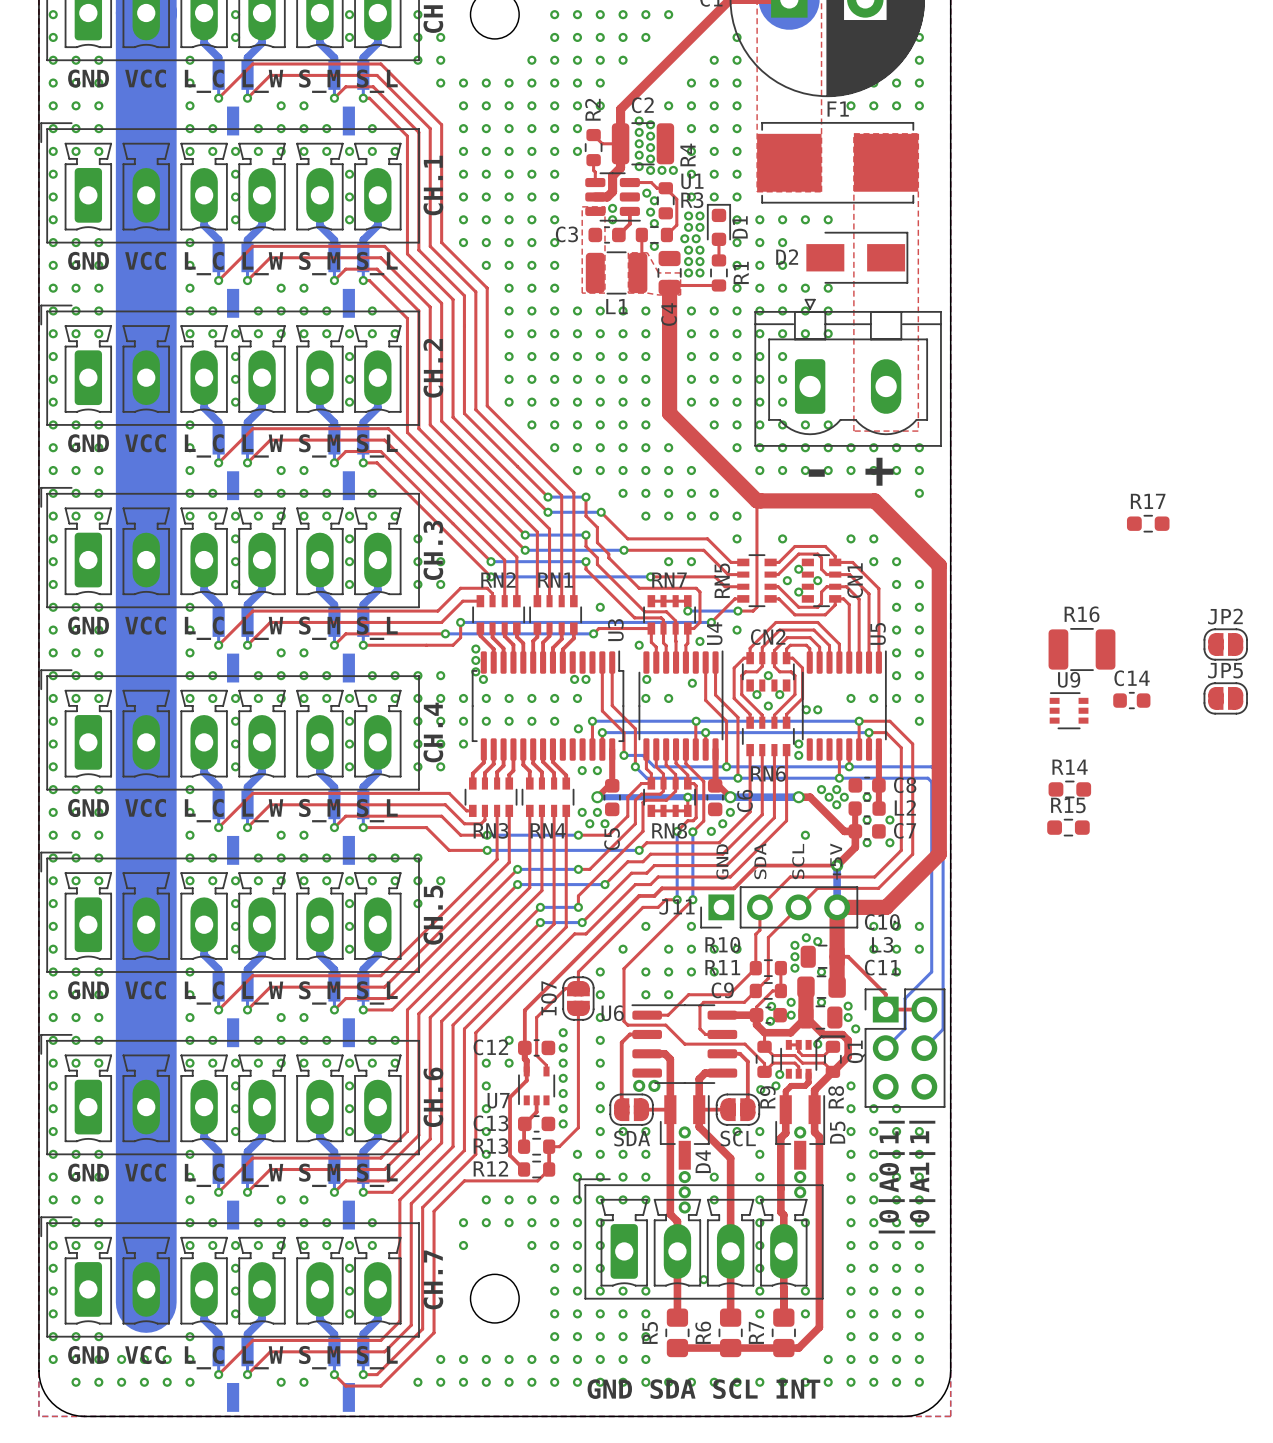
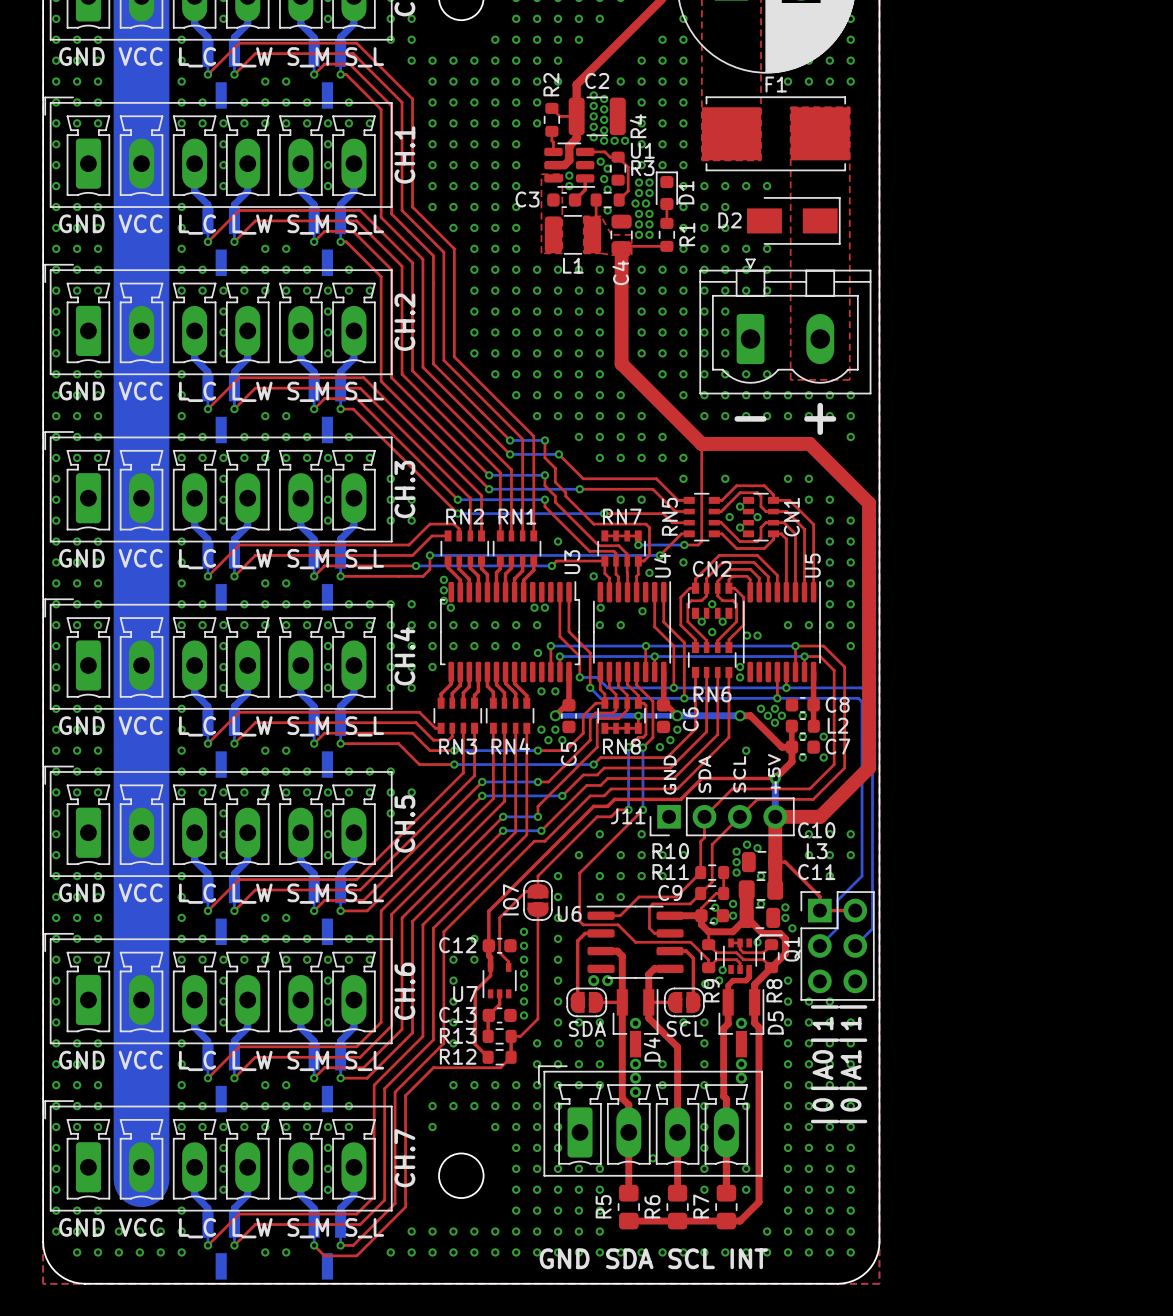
R17: (1148, 523) -> none
JP2: (1225, 644) -> none
R16: (1081, 649) -> none
JP5: (1225, 698) -> none
C14: (1131, 700) -> none
U9: (1069, 710) -> none
R14: (1069, 789) -> none
R15: (1068, 827) -> none

